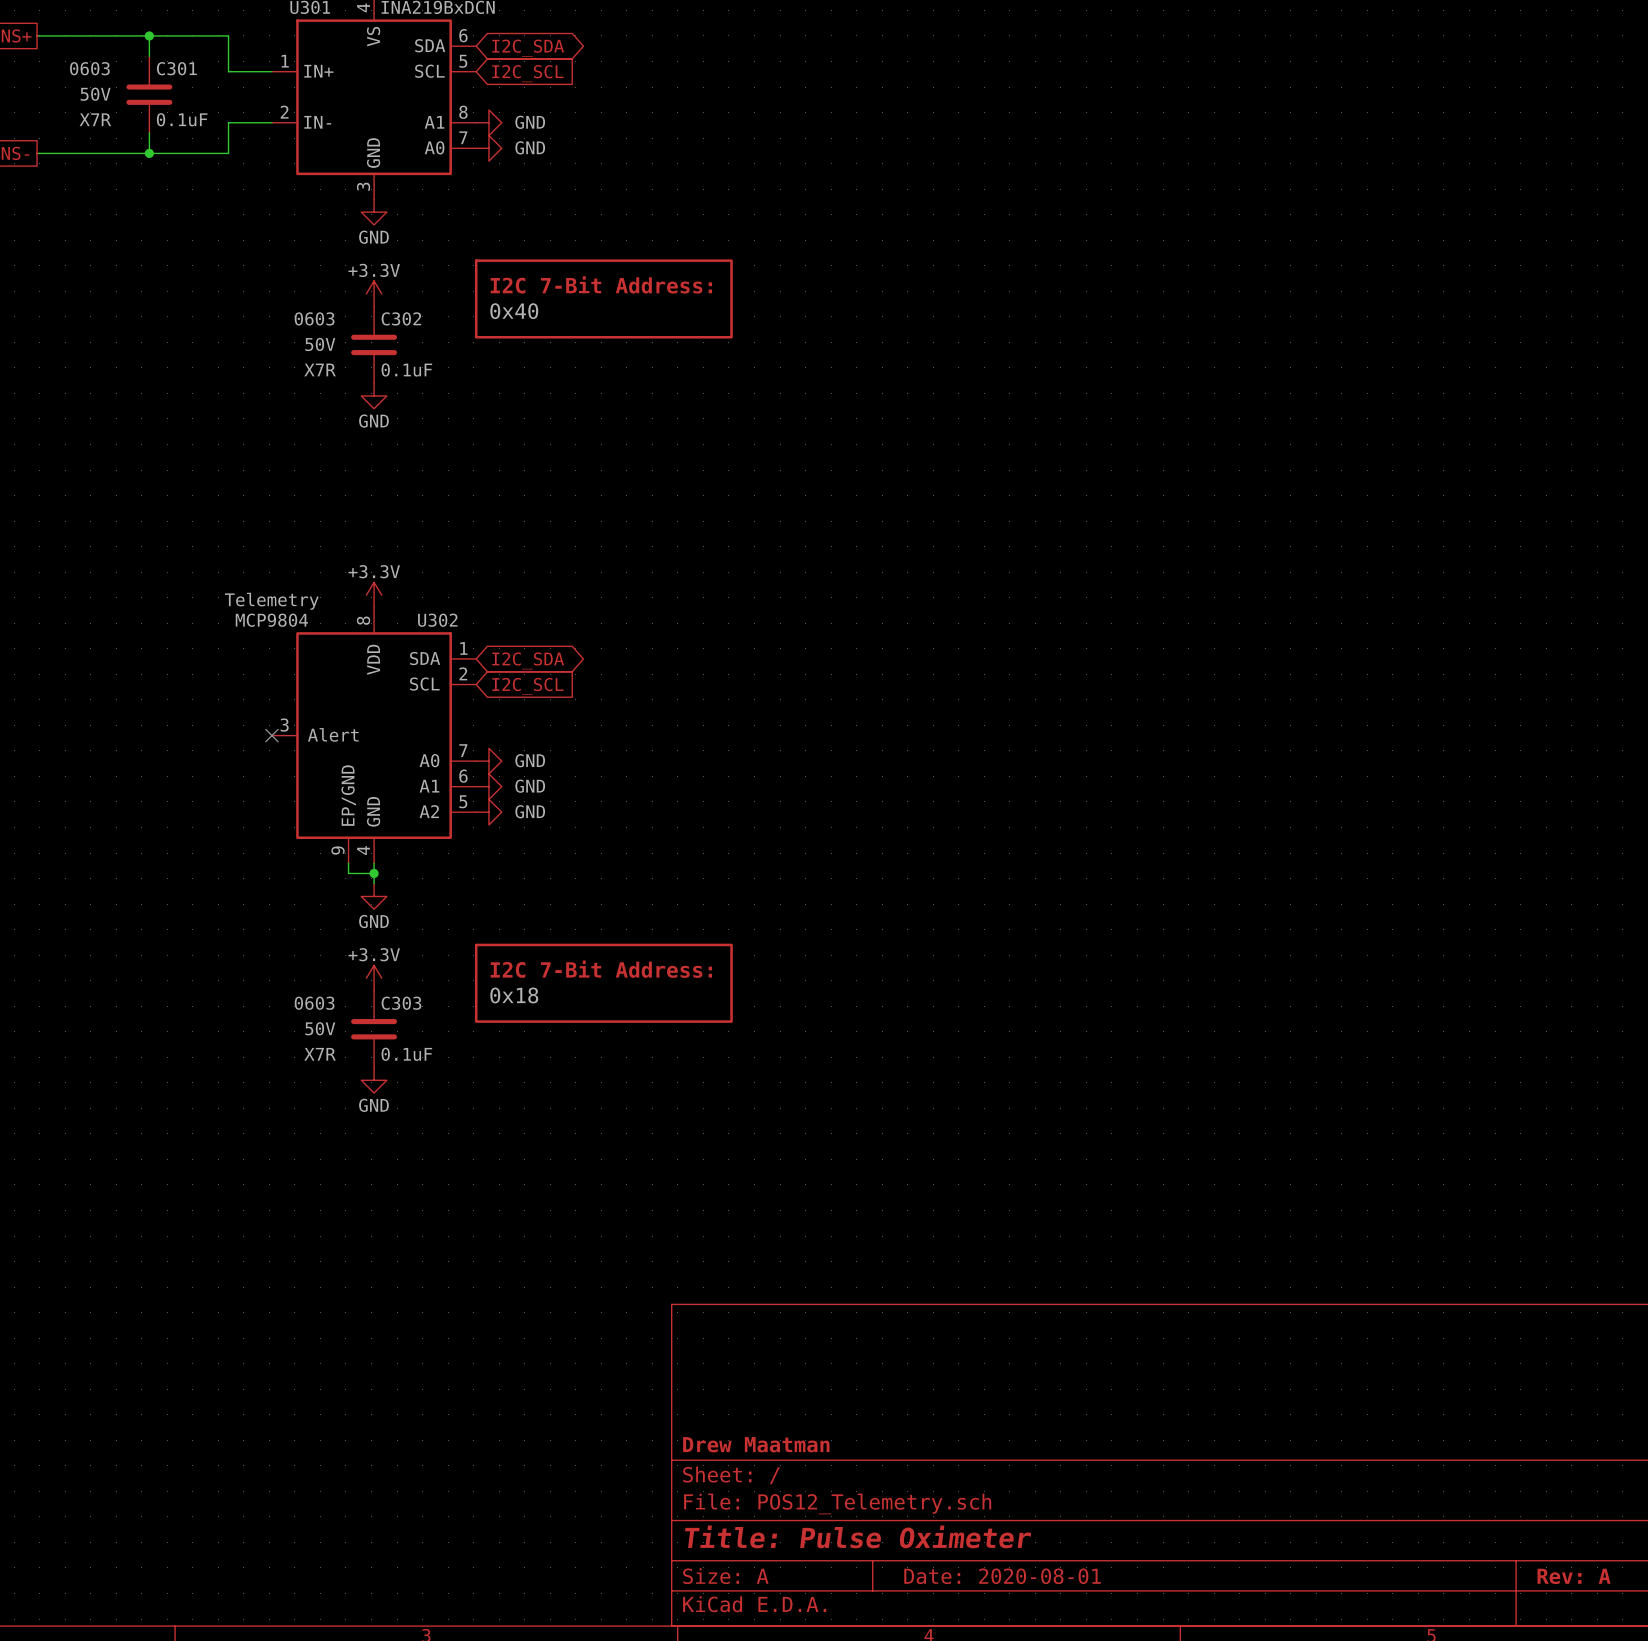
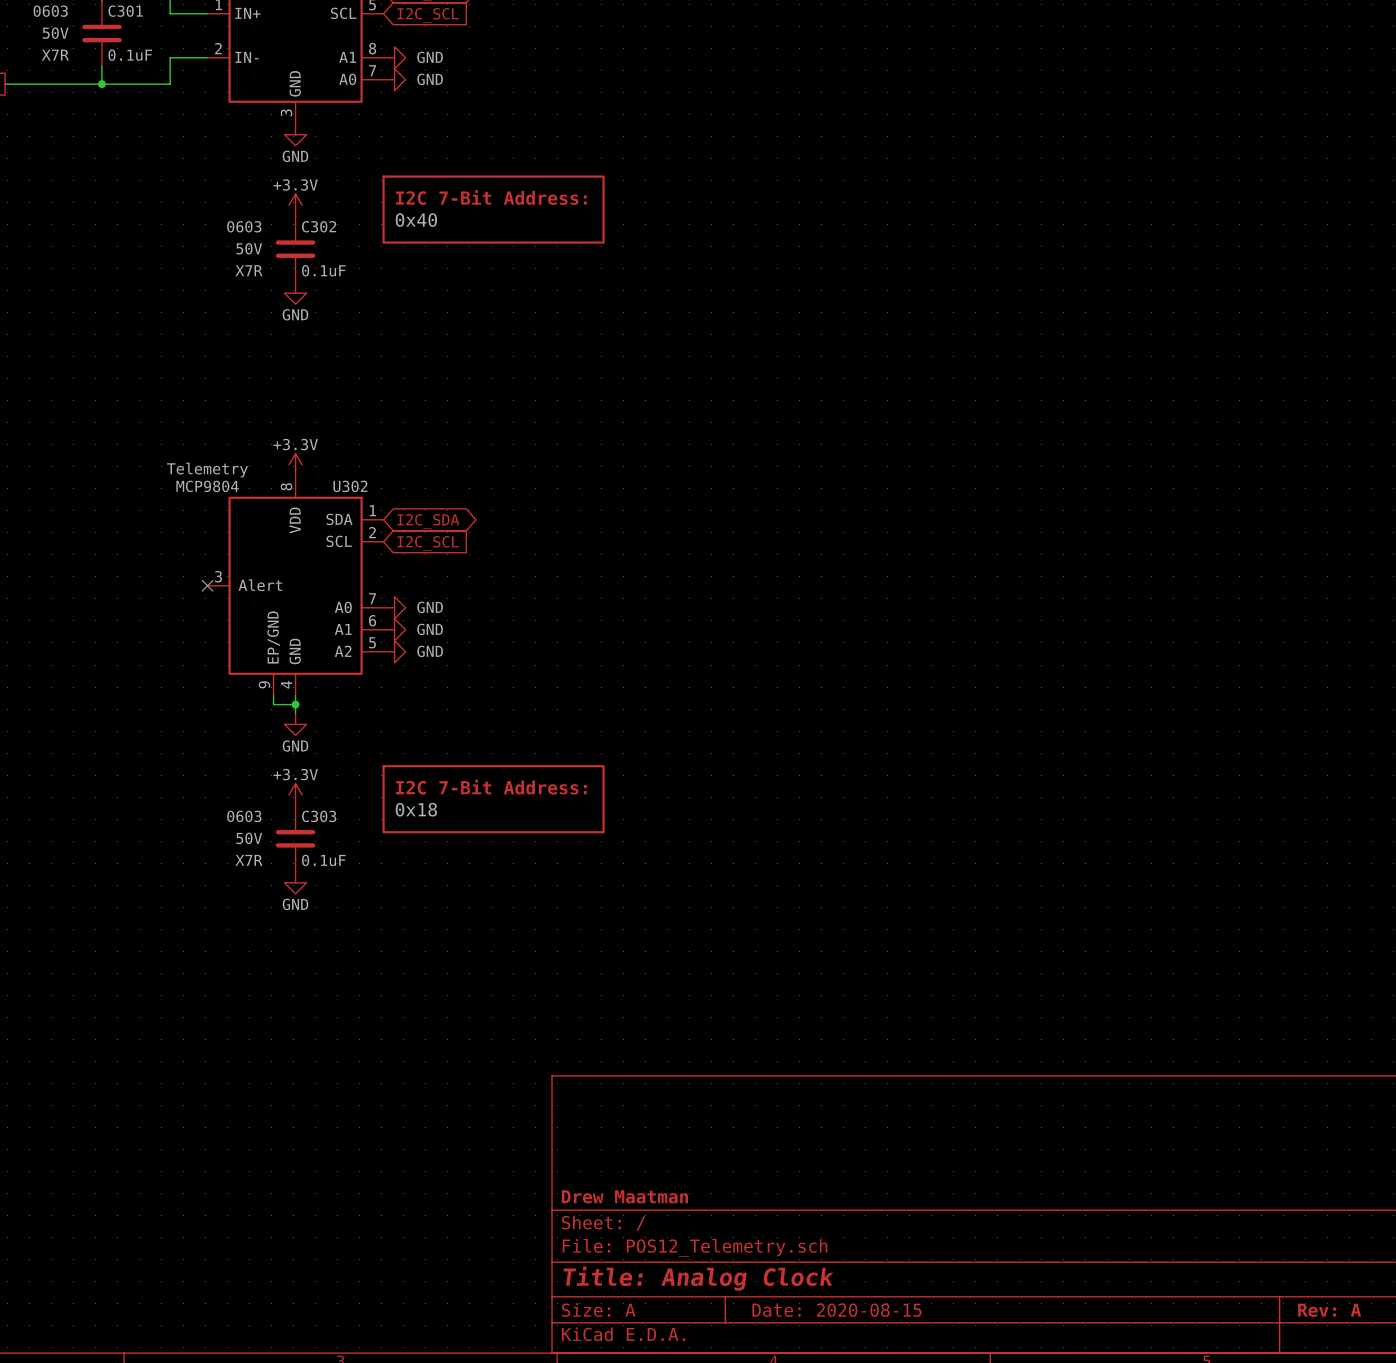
title block: Title: Pulse Oximeter (858, 1536) -> Title: Analog Clock (698, 1278)
title block: Date: 2020-08-01 (1002, 1576) -> Date: 2020-08-15 (836, 1310)

